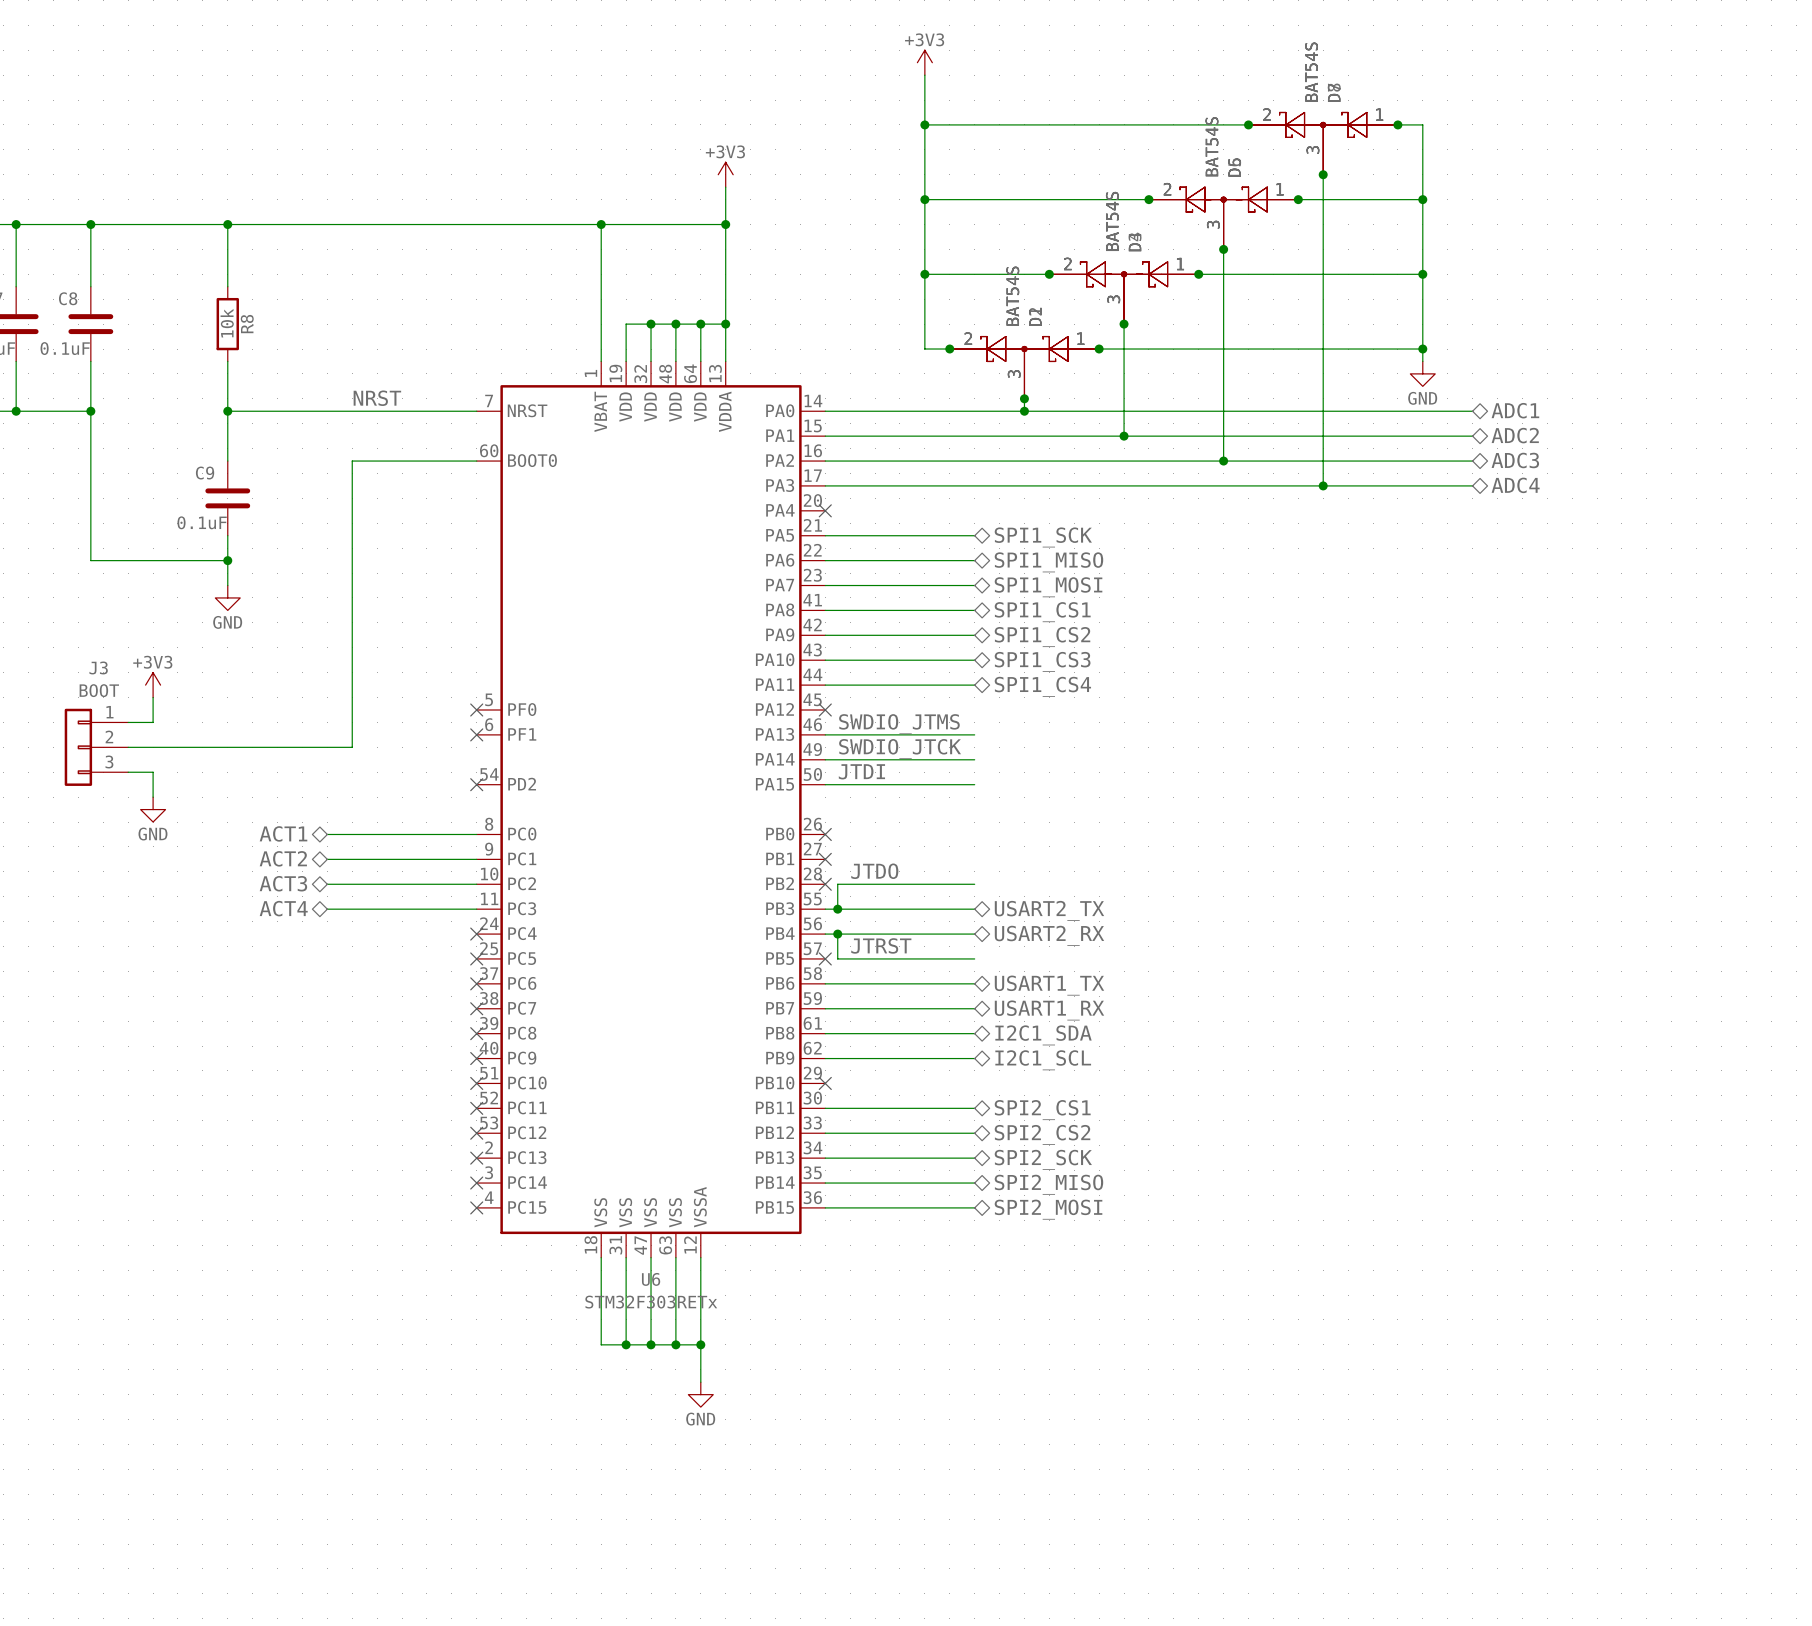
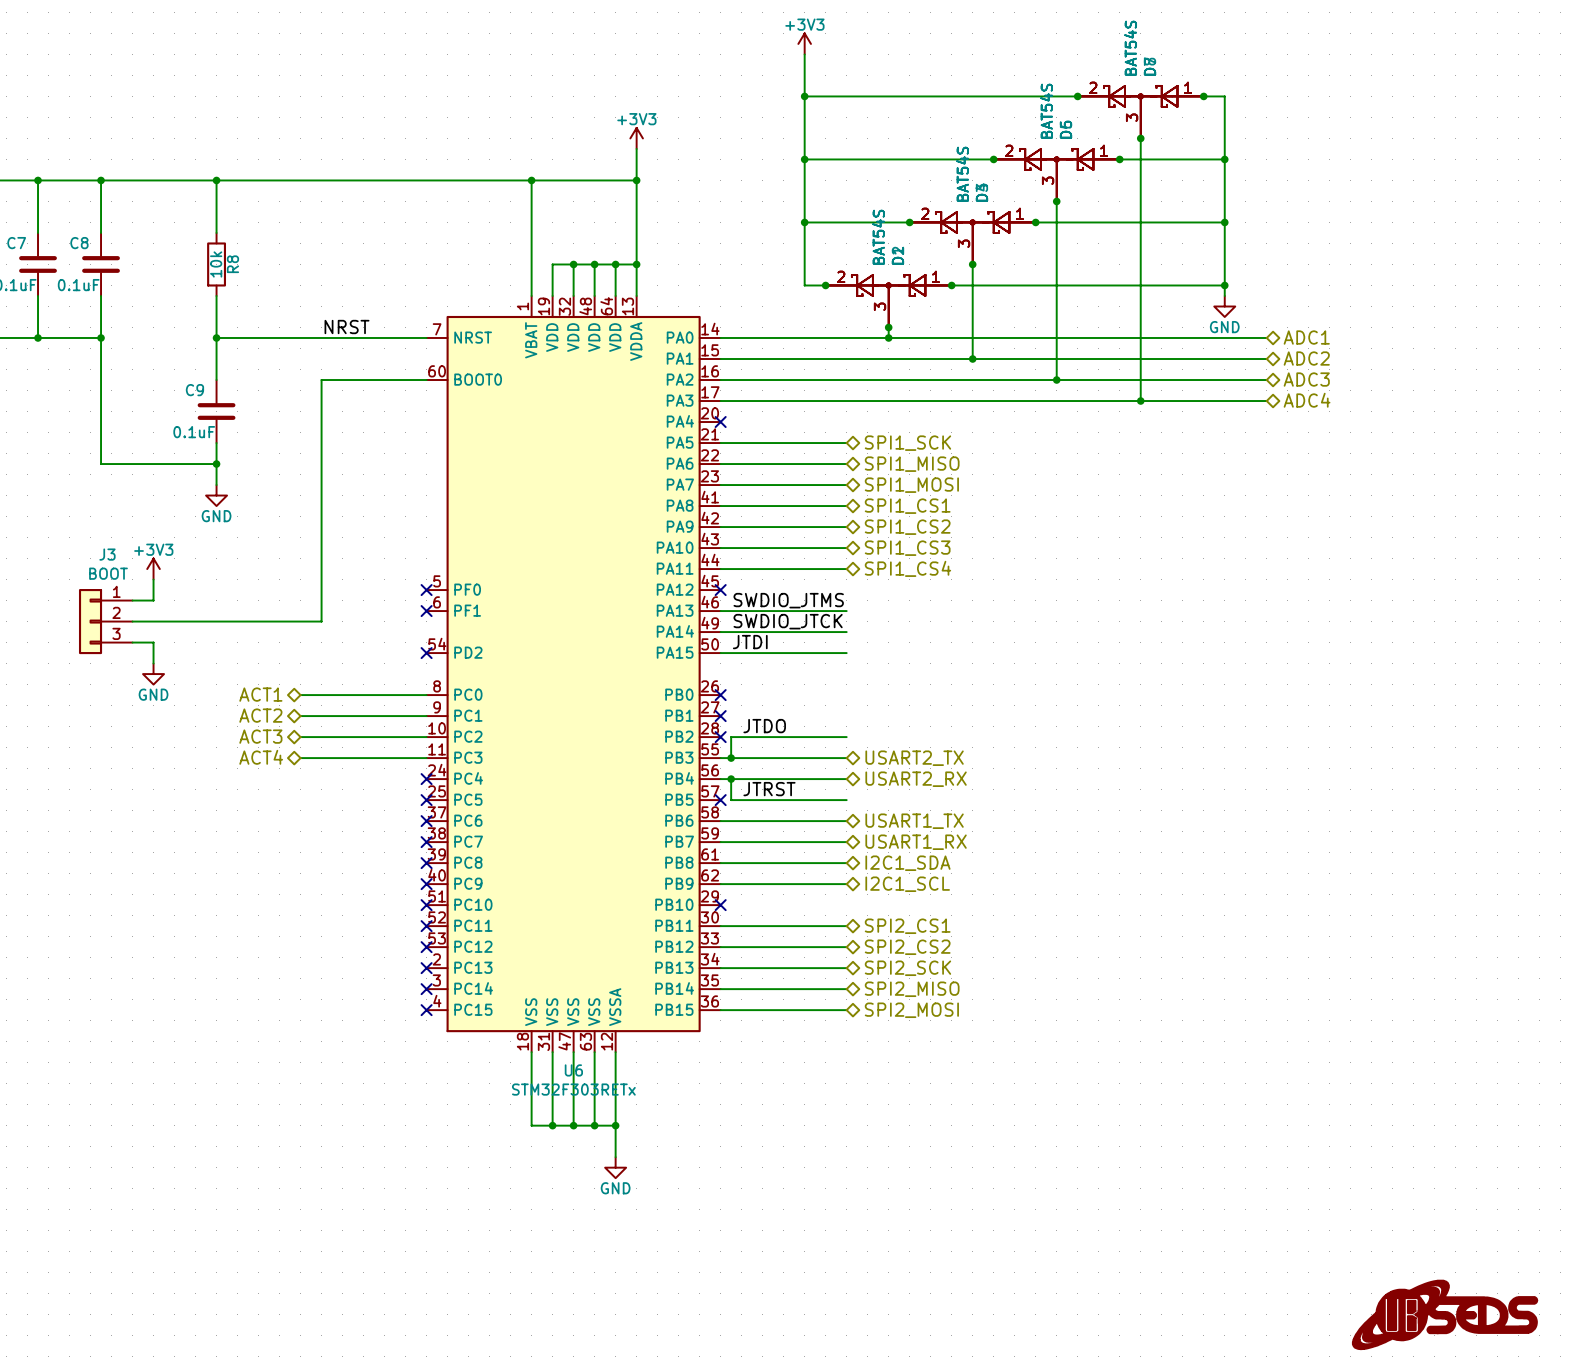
part: none -> (1445, 1314)

